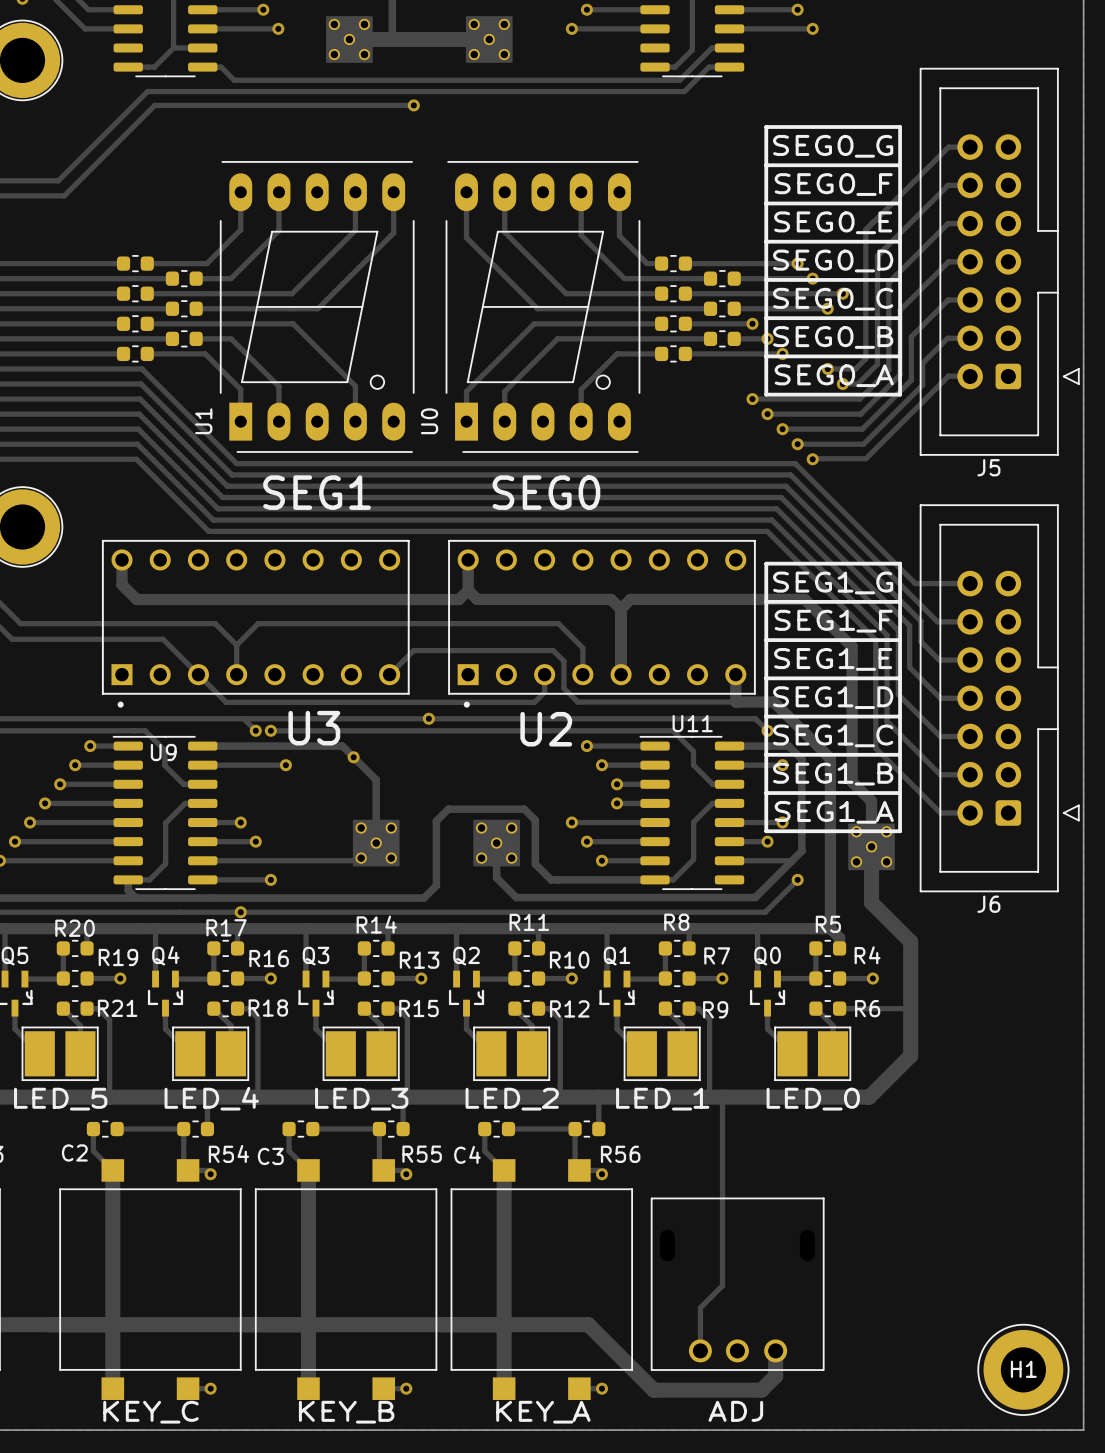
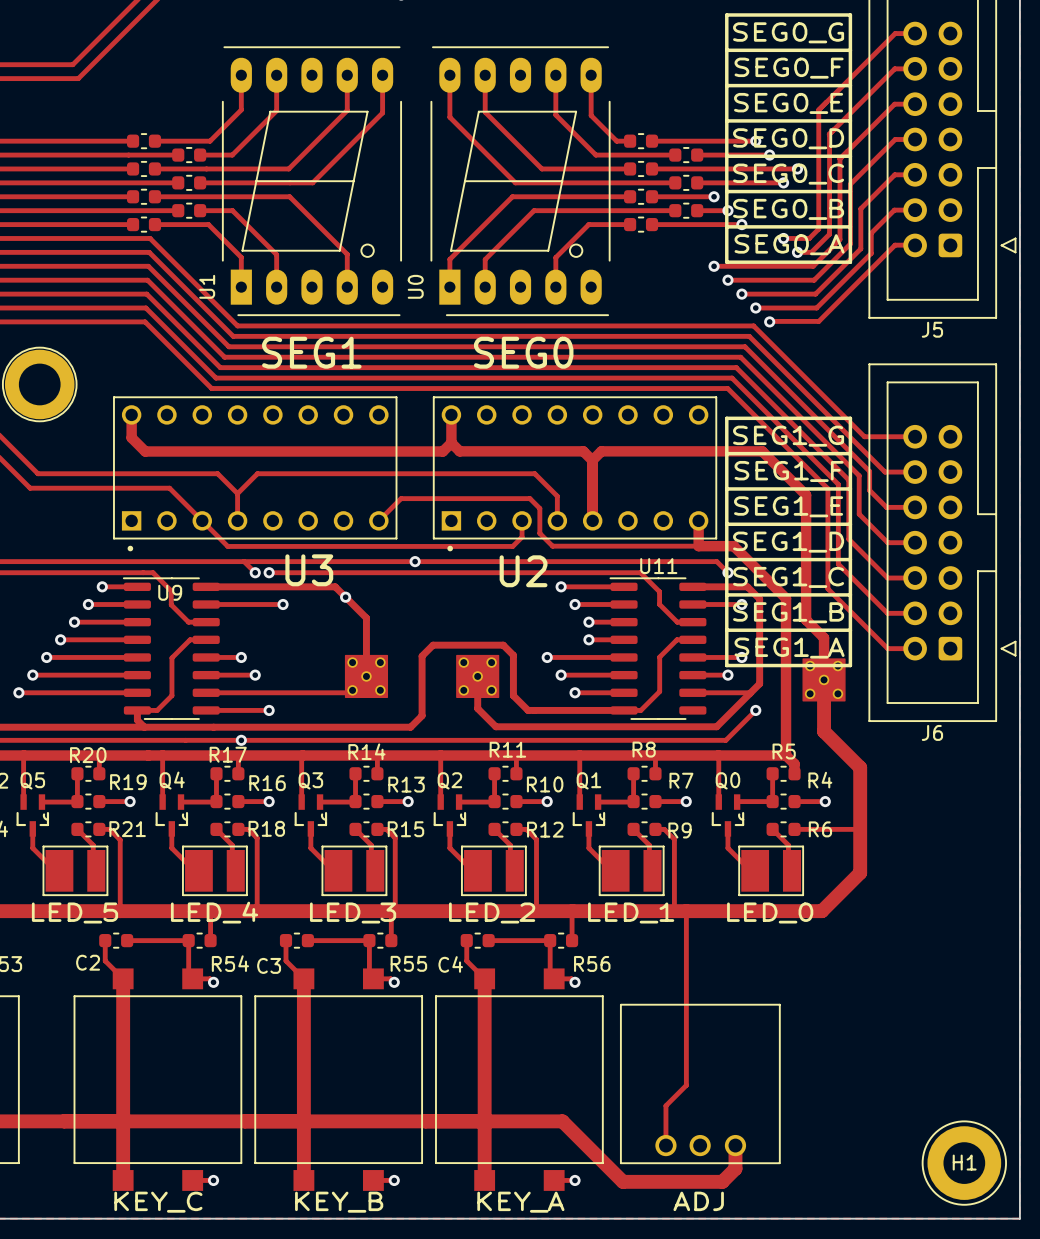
part footprint: [21, 1026, 99, 1082] -> [42, 845, 109, 897]
part footprint: [172, 1026, 250, 1082] -> [182, 845, 248, 897]
part footprint: [322, 1026, 400, 1082] -> [321, 845, 388, 897]
part footprint: [473, 1026, 551, 1082] -> [461, 845, 527, 897]
part footprint: [623, 1026, 701, 1082] -> [598, 845, 665, 897]
part footprint: [774, 1026, 852, 1082] -> [738, 845, 804, 897]

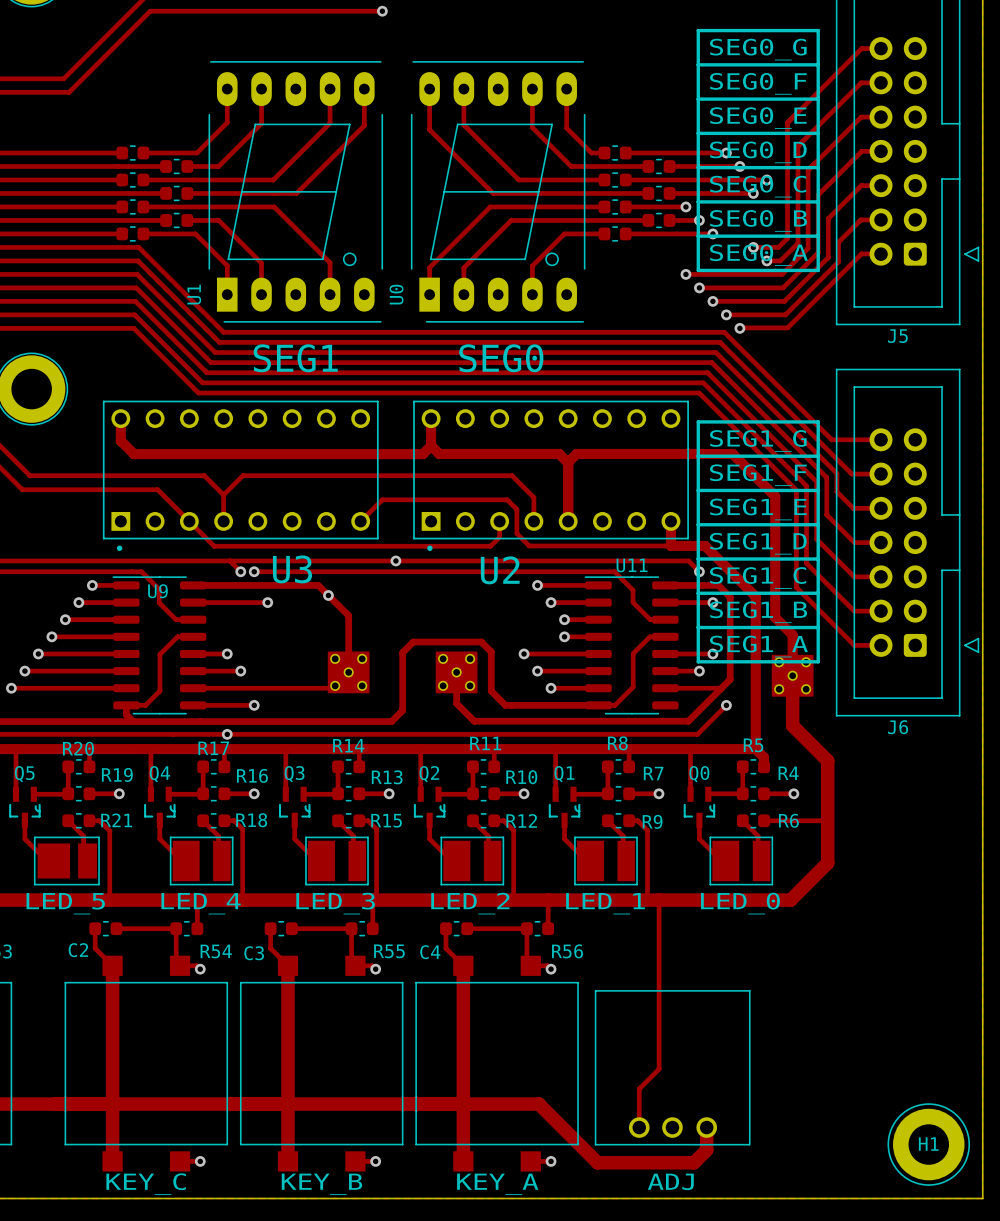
part footprint: [42, 845, 109, 897] -> [33, 836, 100, 886]

